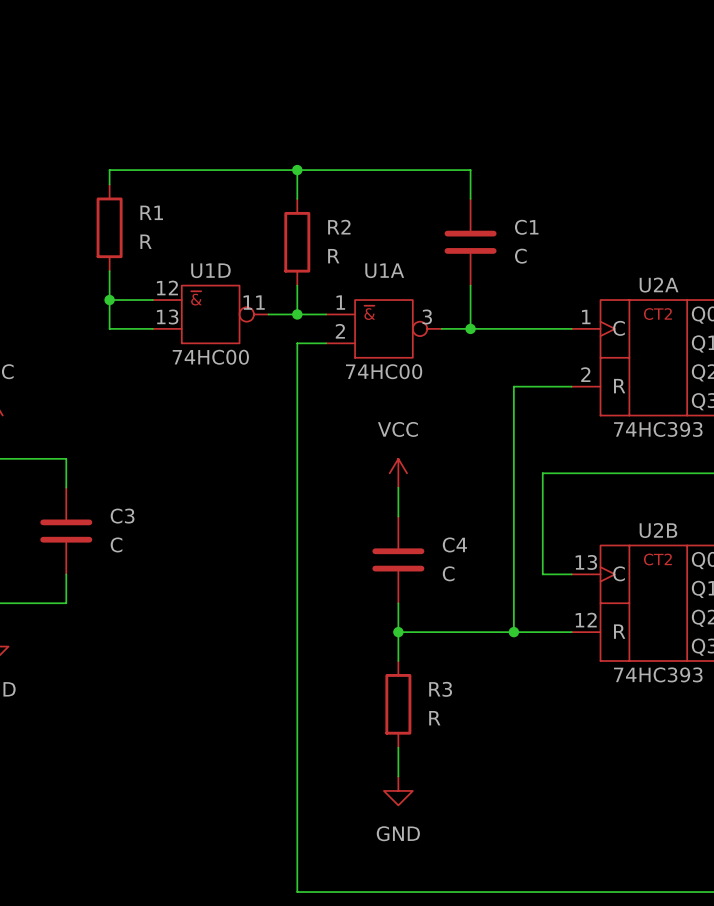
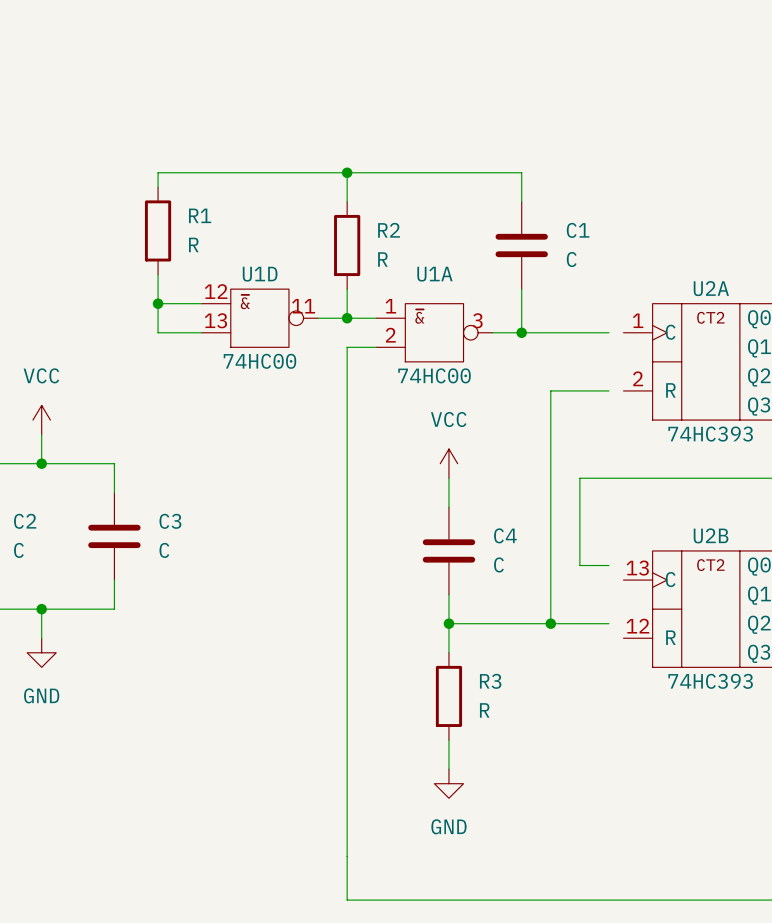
wire: (557, 328) (571, 328) -> none
wire: (513, 386) (513, 632) -> (565, 390) (550, 390) (550, 623)
wire: (557, 386) (571, 386) -> none
power symbol position: VCC (398, 473) -> VCC (448, 463)
wire: (542, 473) (542, 574) (571, 574) -> (594, 478) (579, 478) (579, 565) (608, 565)
C4 position: (398, 559) -> (448, 550)
wire: none -> (448, 623) (608, 623)
wire: (398, 632) (571, 632) -> none
junction position: (398, 632) -> (448, 623)
junction position: (513, 632) -> (550, 623)
R3 position: (398, 704) -> (448, 696)
power symbol position: GND (398, 790) -> GND (448, 783)

